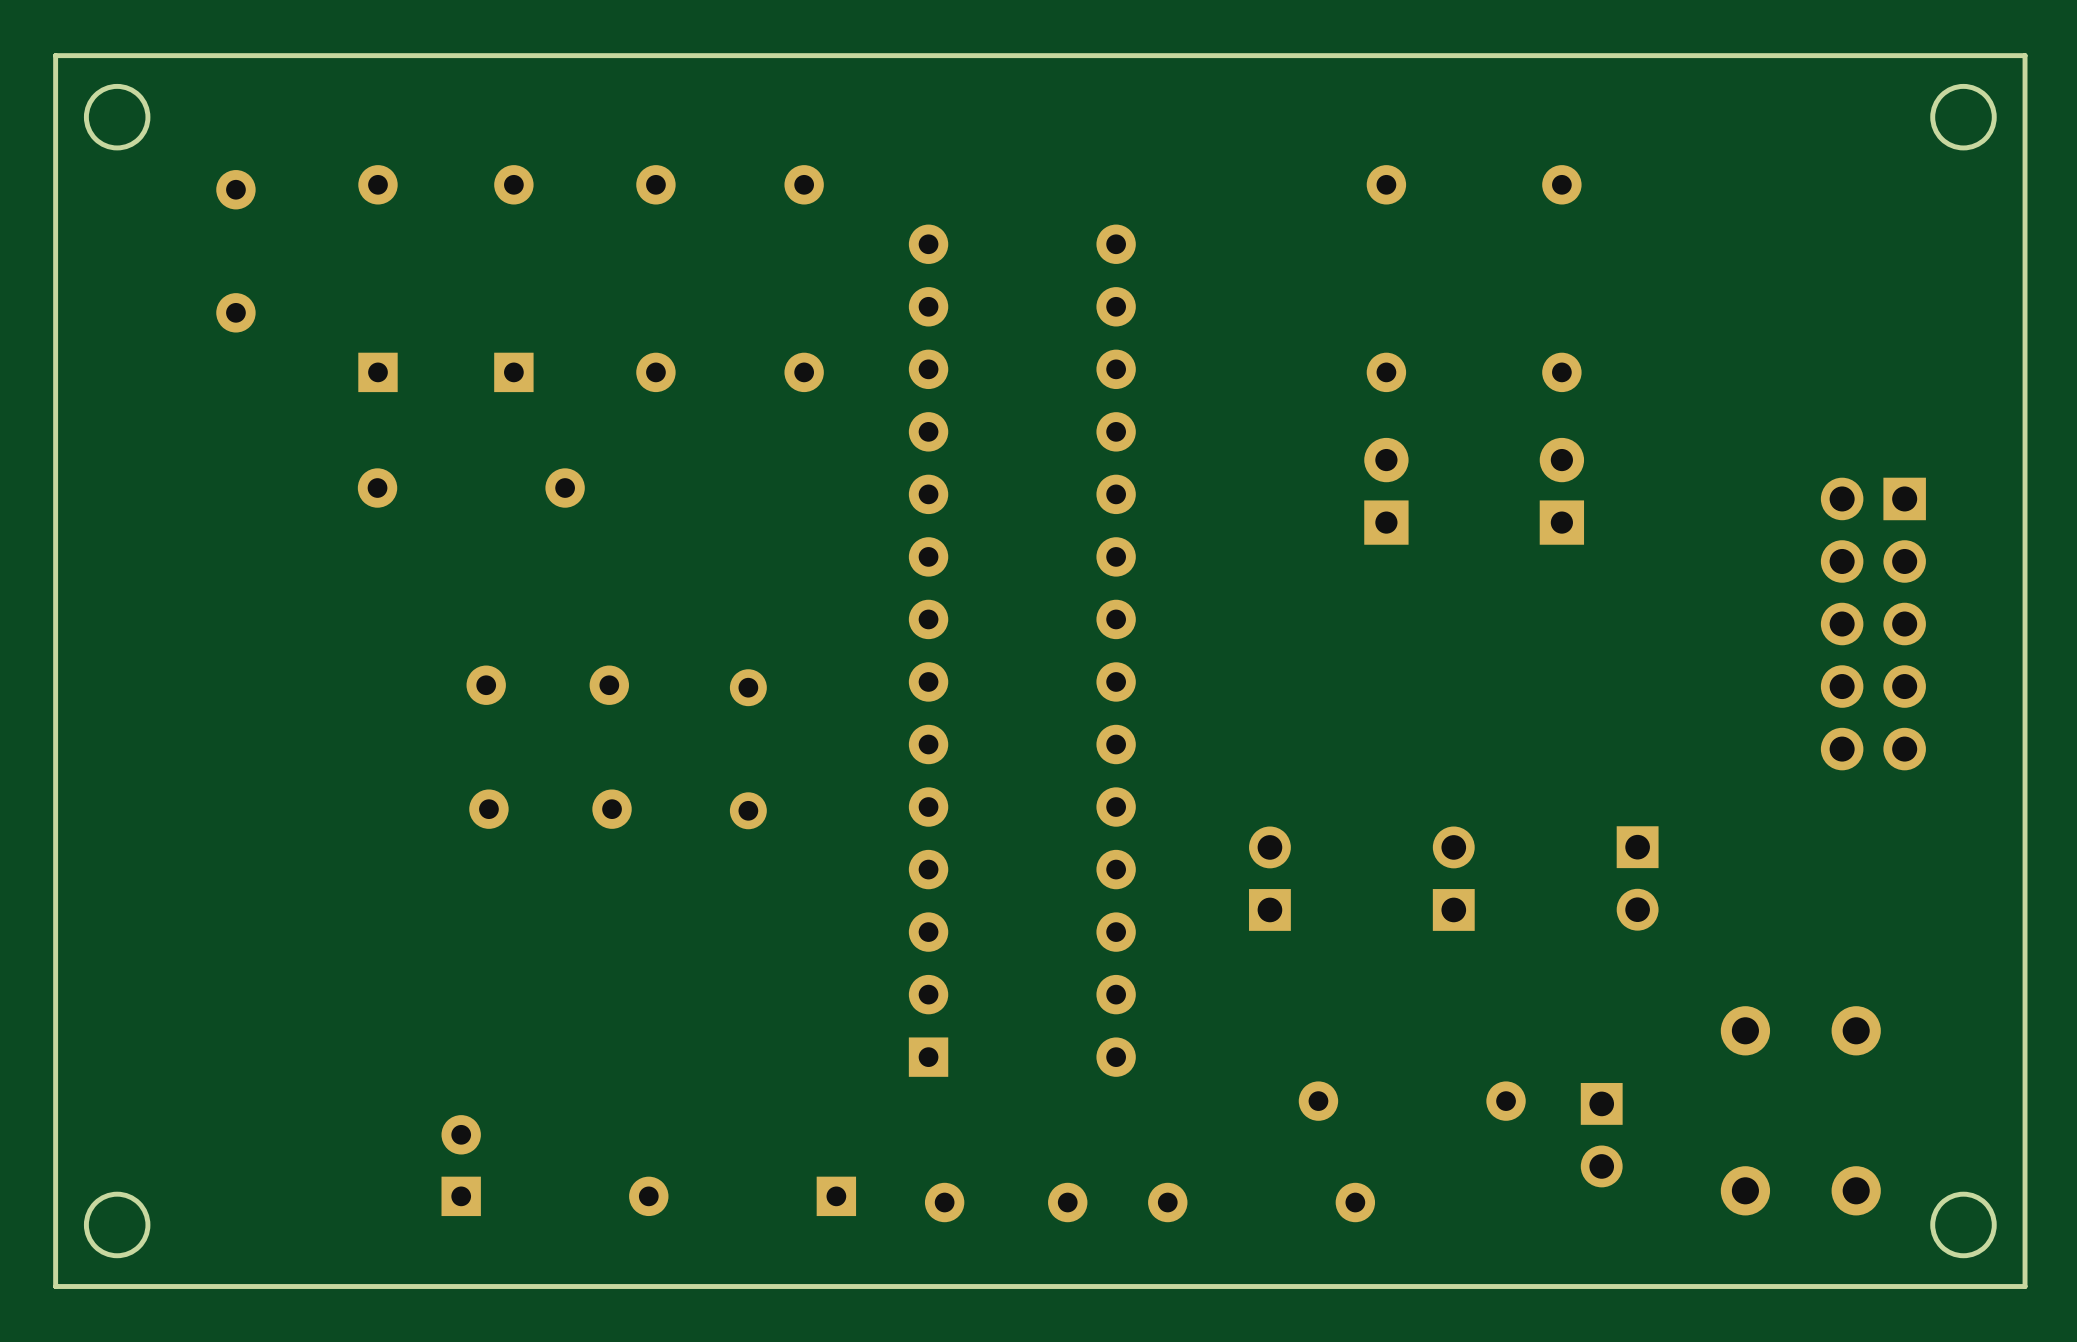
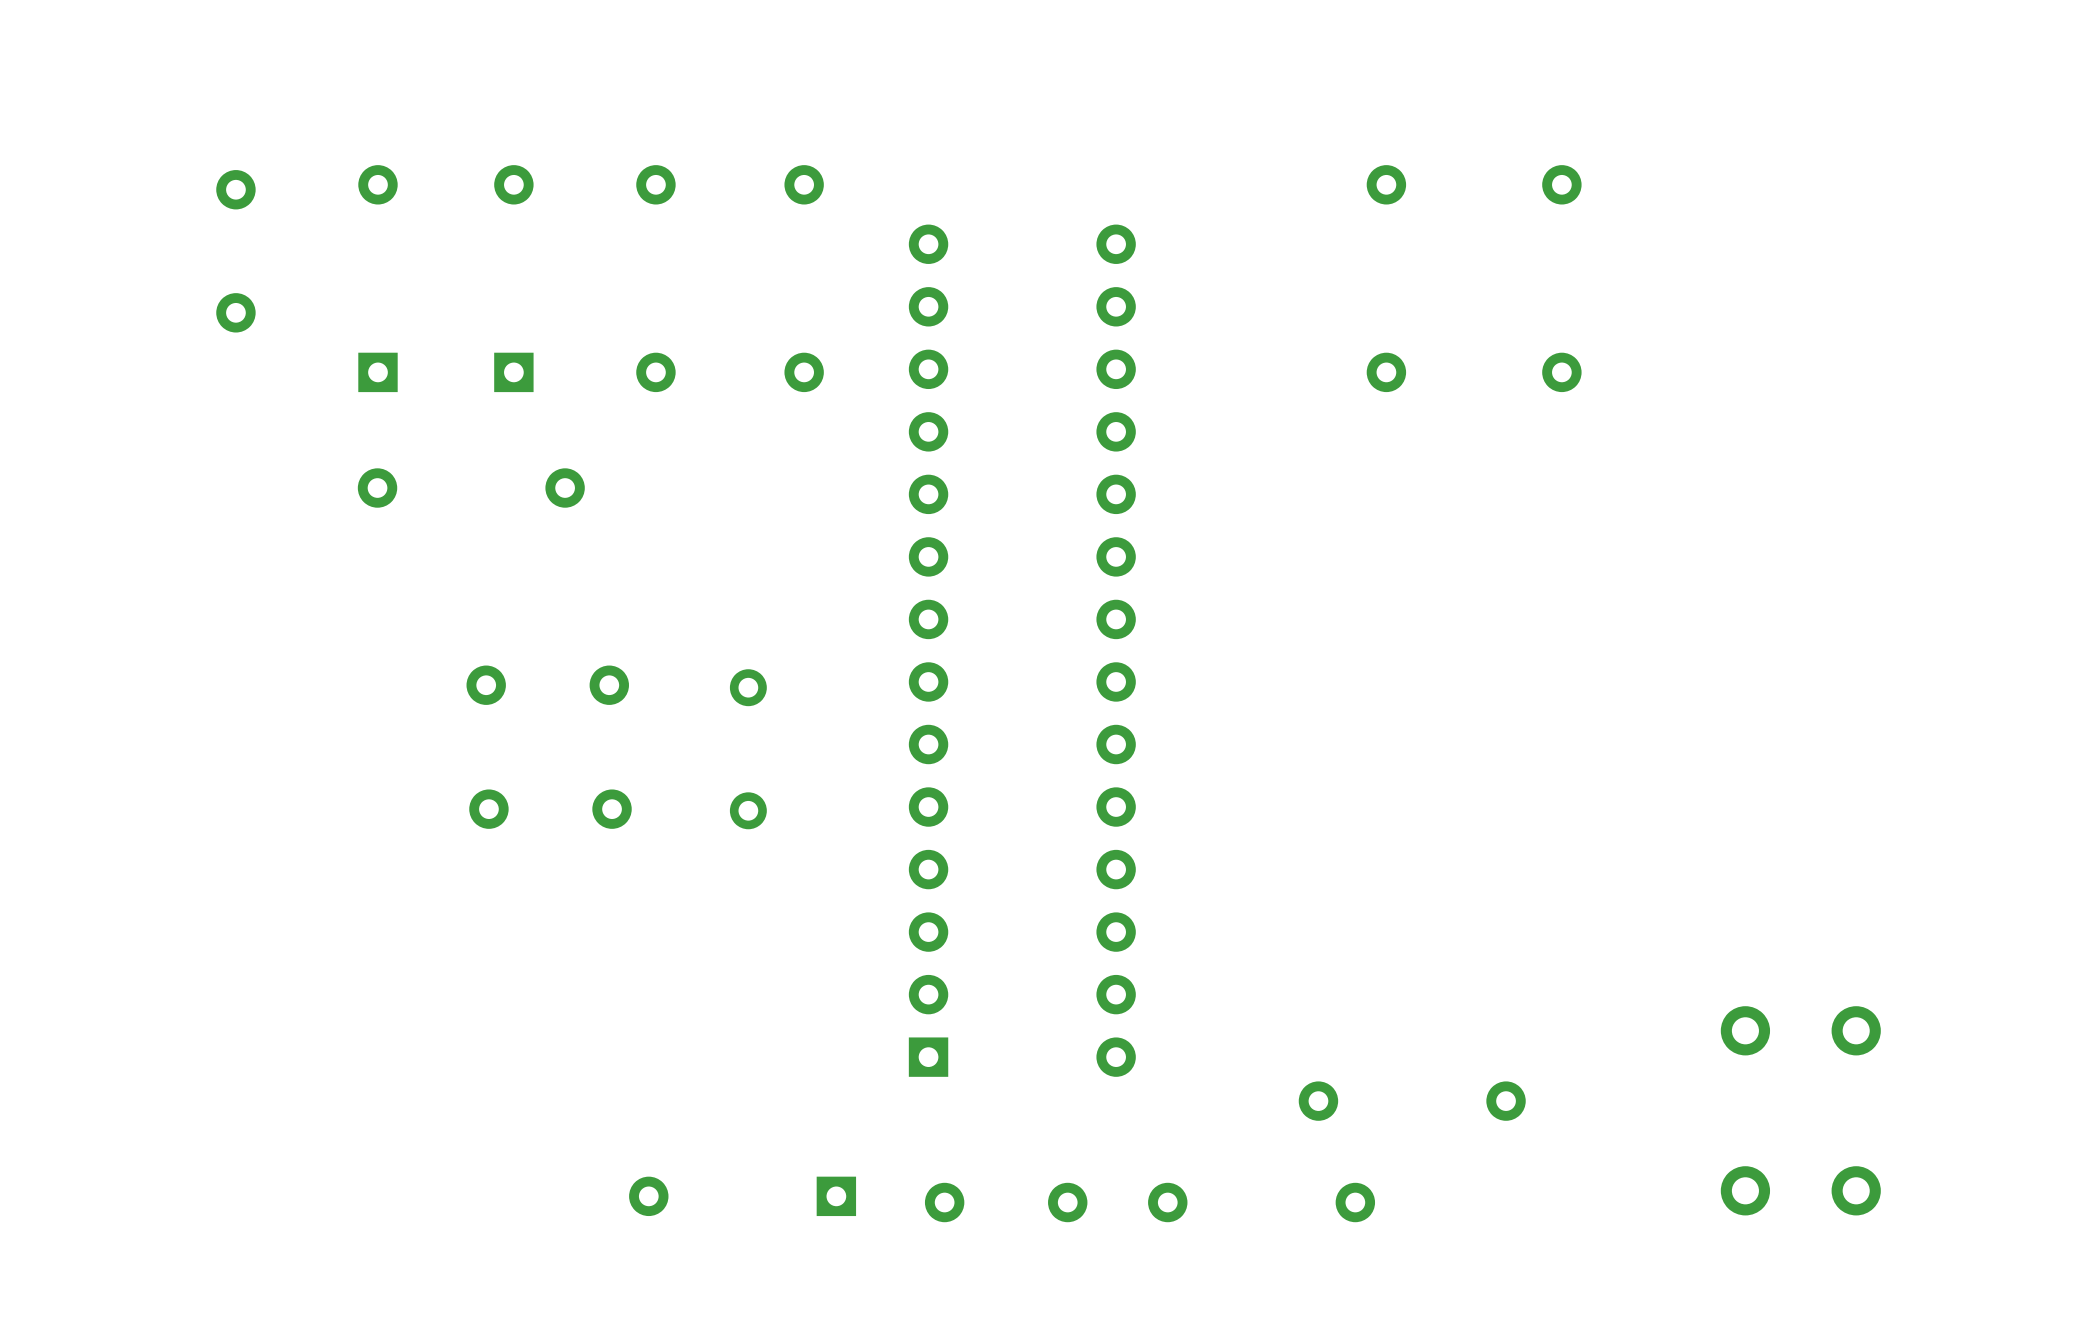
board edge: (2025, 55) (2025, 1286) (55, 1286) (55, 55) (2025, 55) -> none
round board edge: [83, 83, 151, 151] -> none
round board edge: [1930, 83, 1997, 151] -> none
part: (1386, 491) -> none
part: (1561, 491) -> none
part: (1873, 624) -> none
part: (1269, 878) -> none
part: (1453, 878) -> none
part: (1637, 878) -> none
part: (1601, 1135) -> none
part: (461, 1165) -> none
round board edge: [83, 1191, 151, 1259] -> none
round board edge: [1930, 1191, 1997, 1259] -> none

